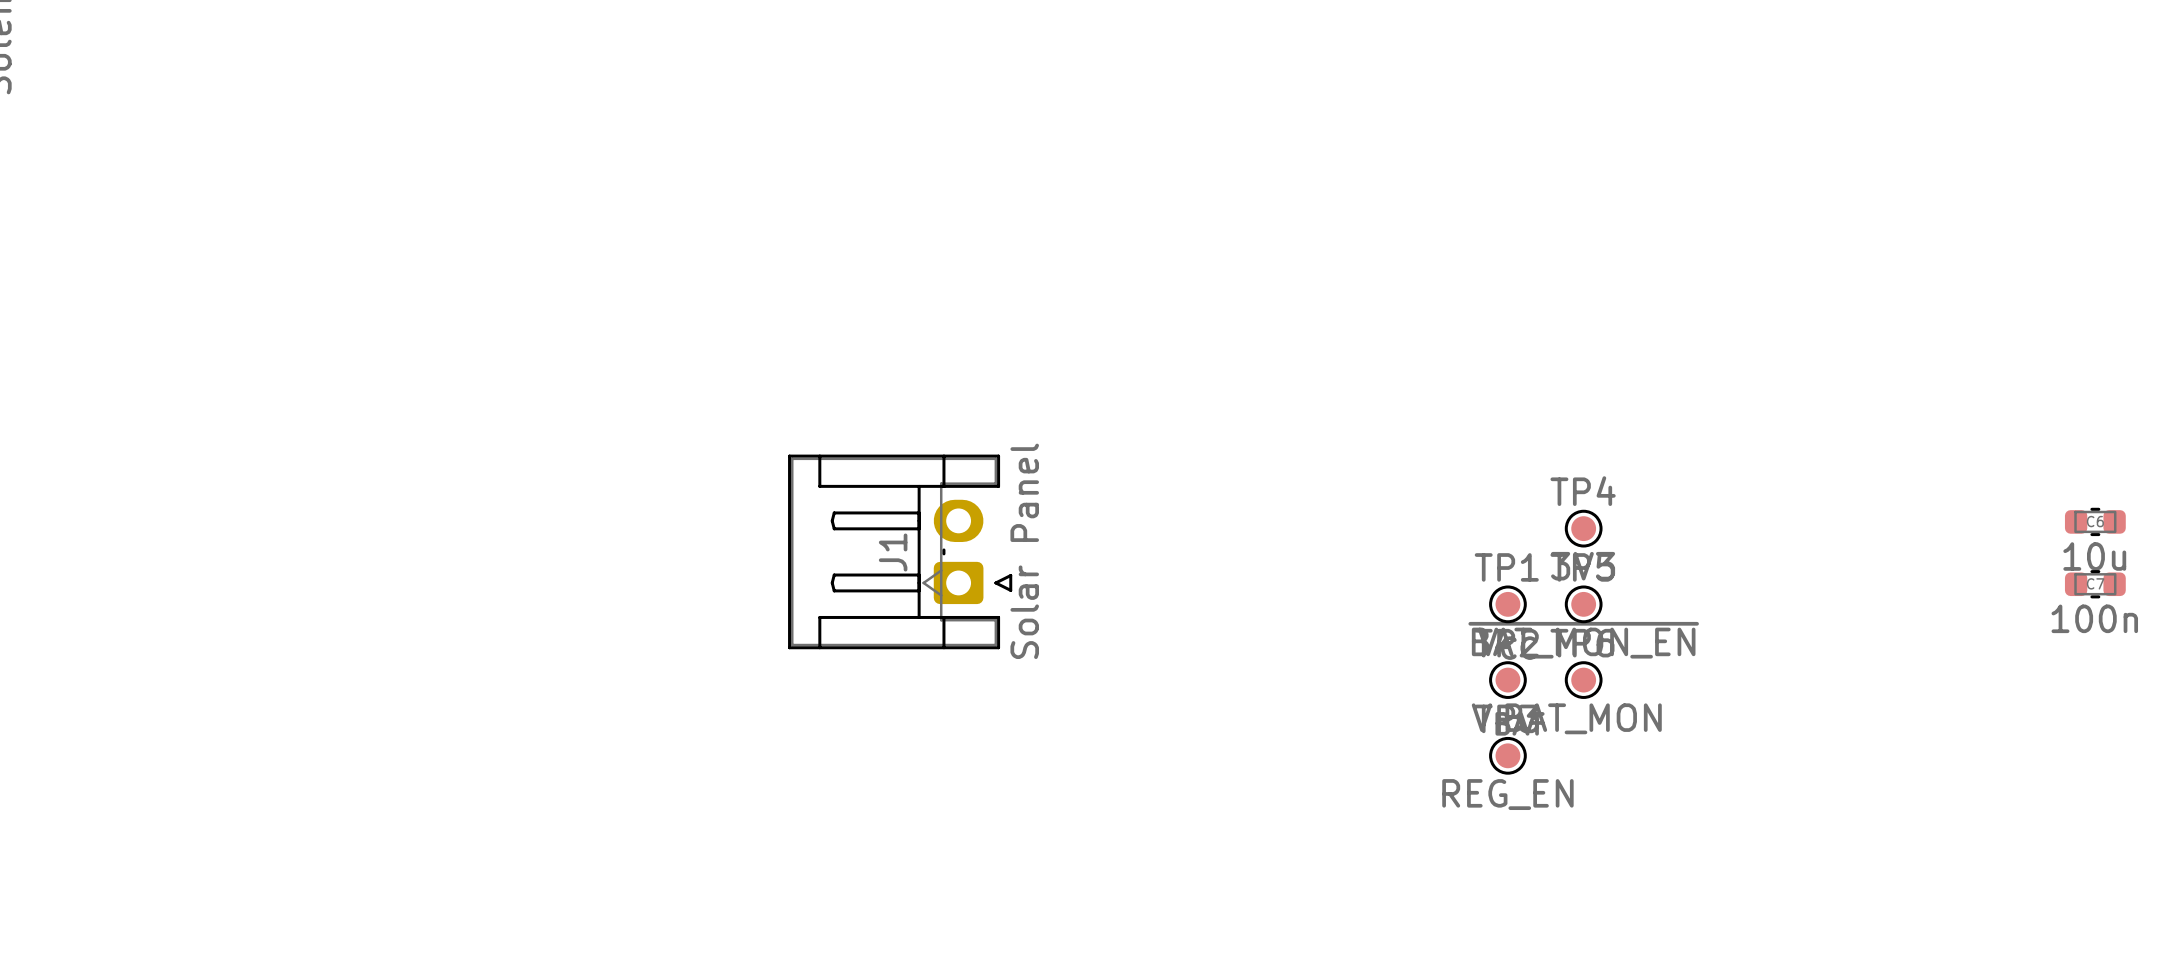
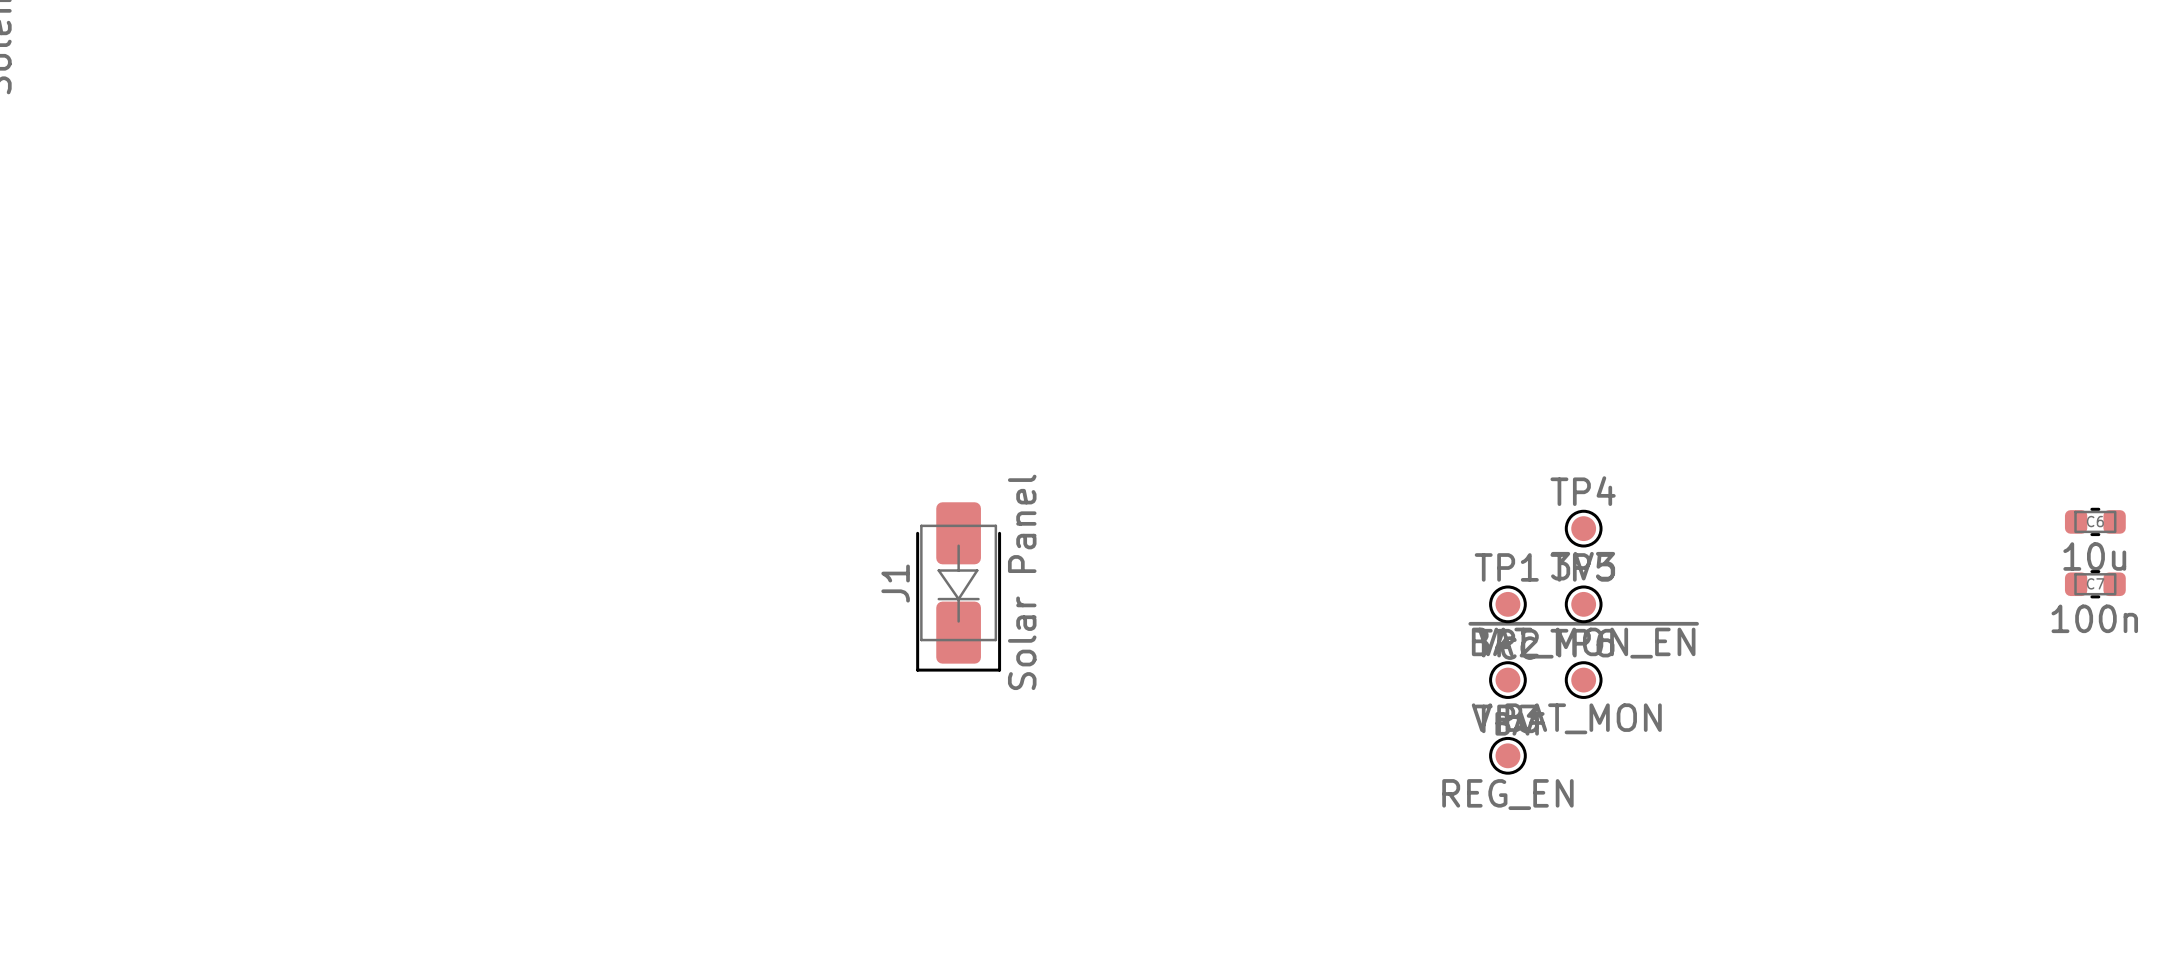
J1 footprint: [788, 454, 1013, 650] -> [916, 502, 1002, 672]
J1 value position: Solar Panel (1024, 551) -> Solar Panel (1022, 582)
J1 name position: J1 (893, 552) -> J1 (895, 583)

